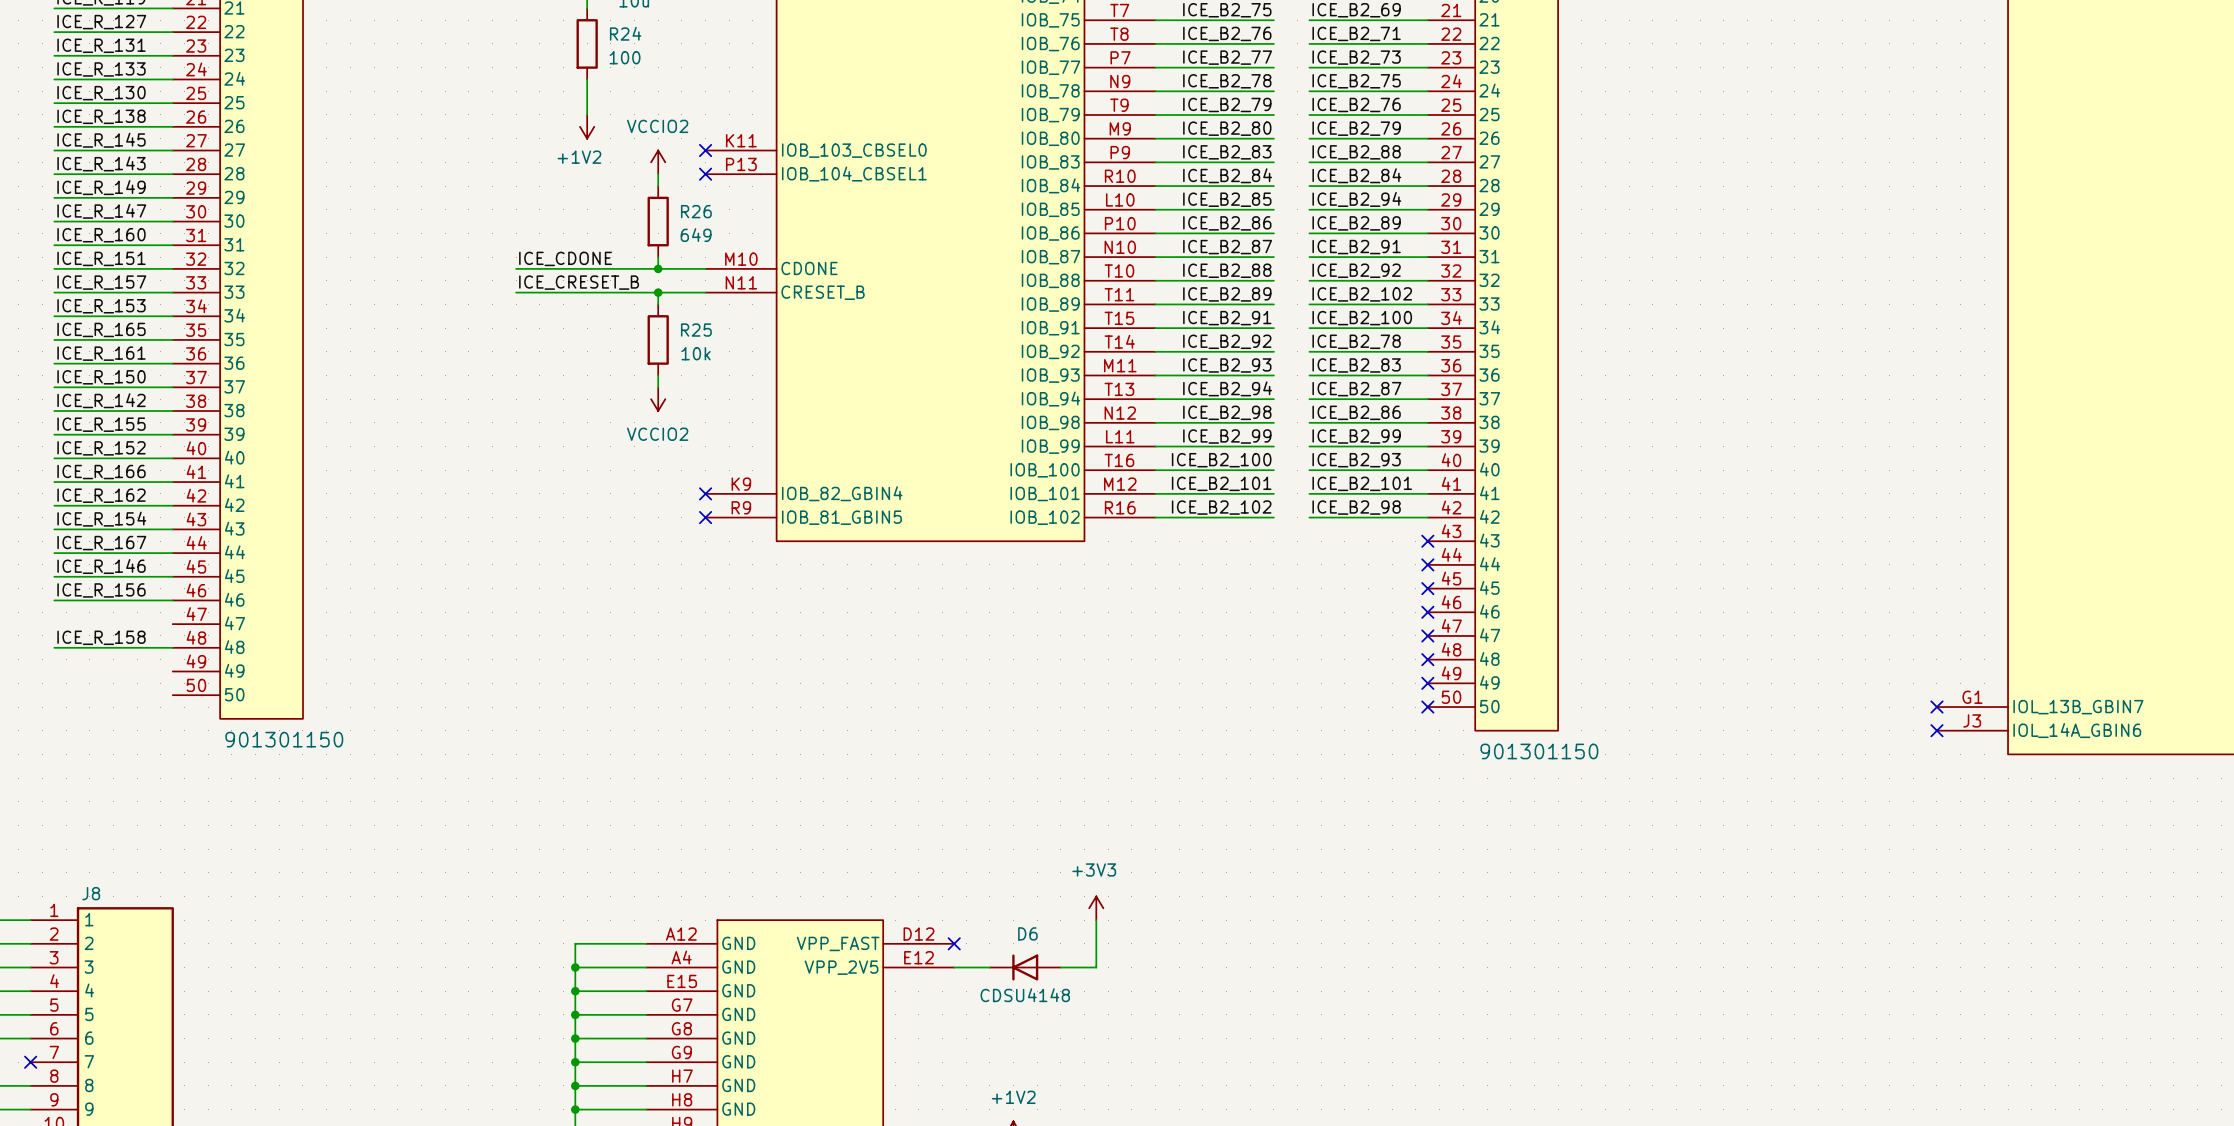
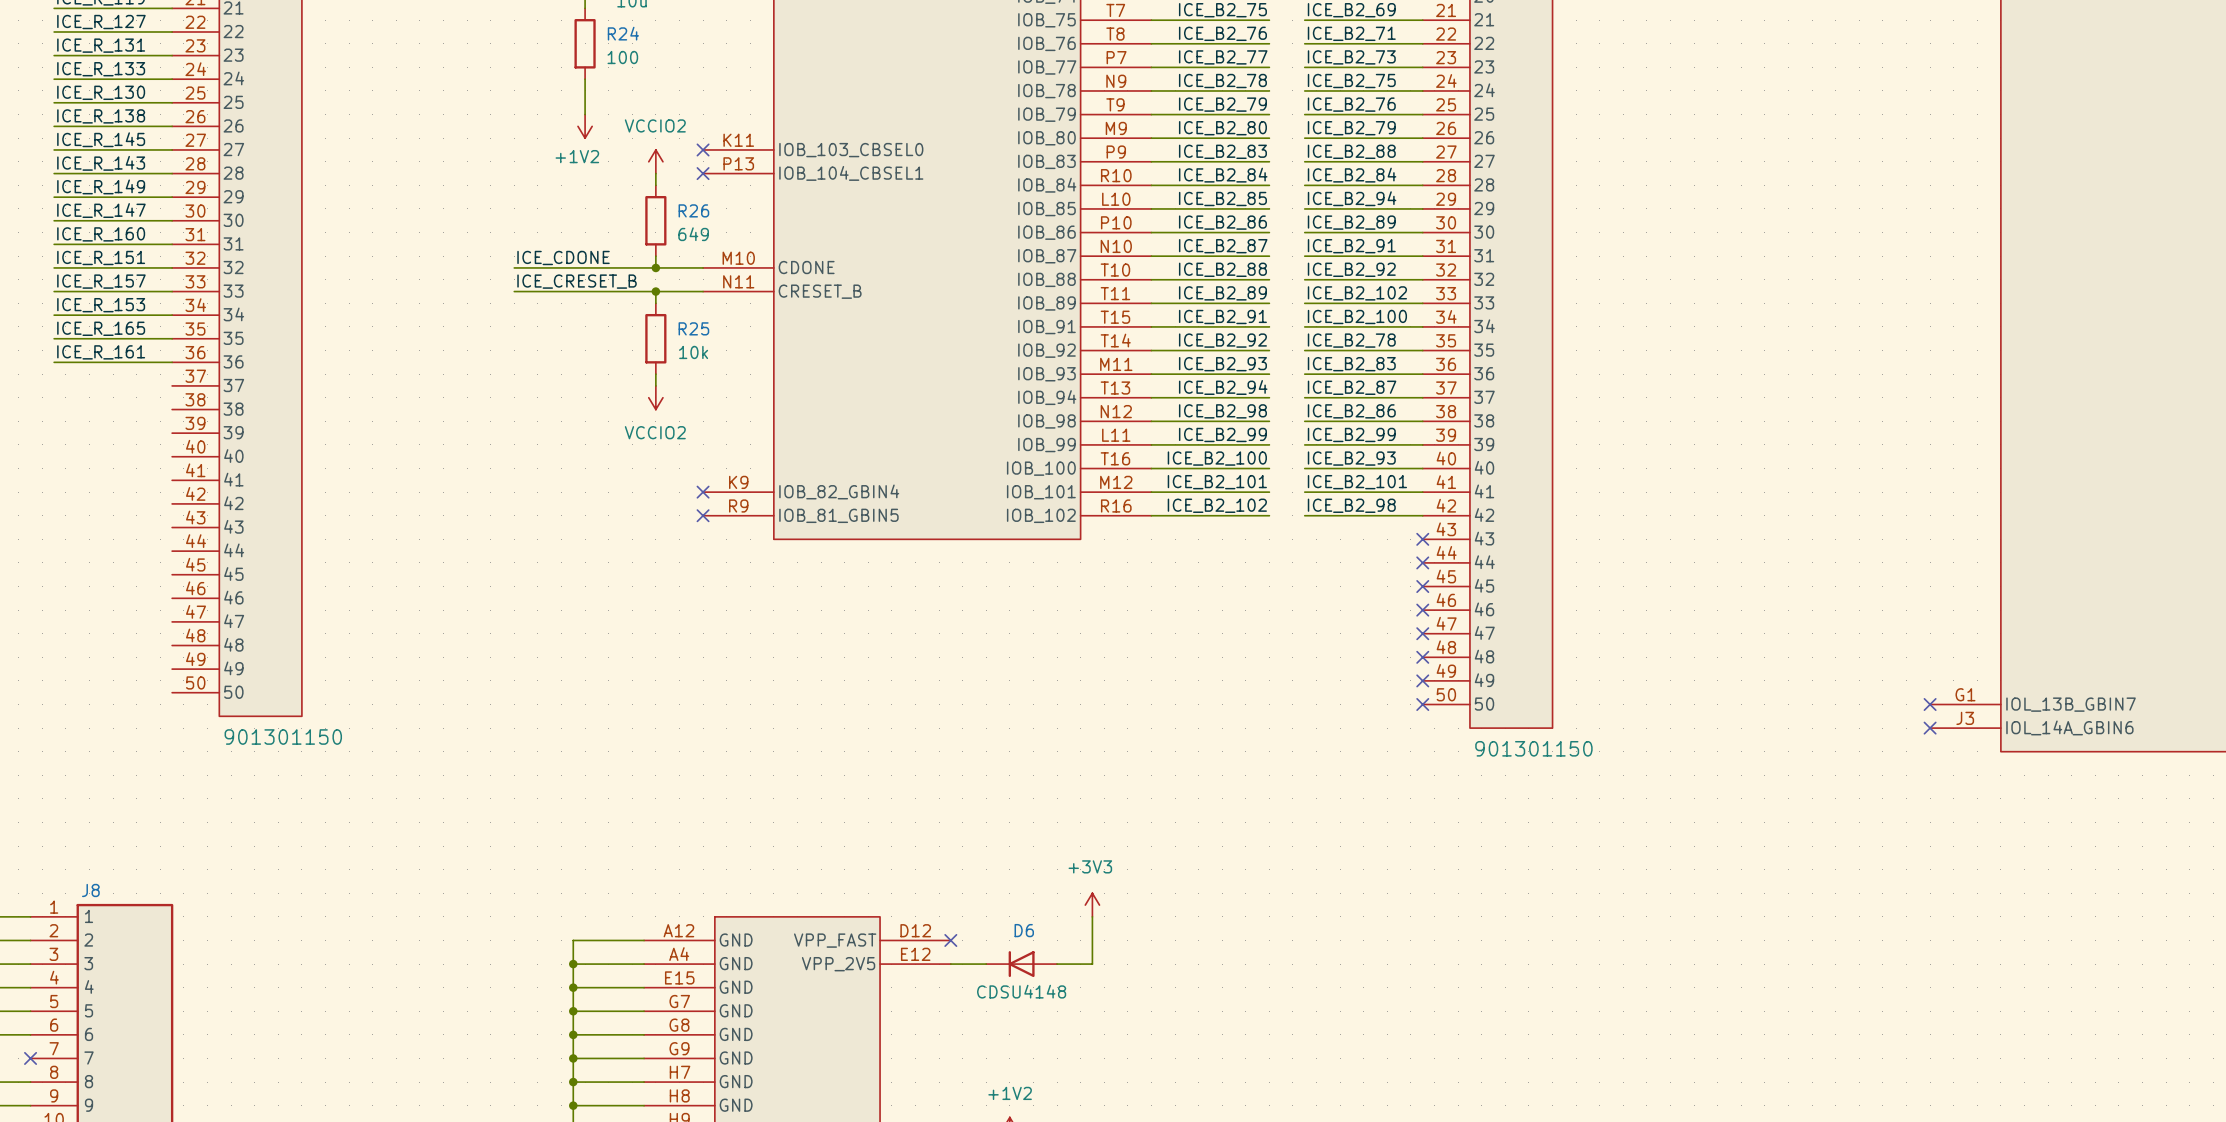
label: ICE_R_150 (101, 377) -> none
wire: (54, 387) (172, 387) -> none
label: ICE_R_142 (101, 400) -> none
wire: (54, 411) (172, 411) -> none
label: ICE_R_155 (101, 424) -> none
wire: (54, 434) (172, 434) -> none
label: ICE_R_152 (101, 448) -> none
wire: (54, 458) (172, 458) -> none
label: ICE_R_166 (101, 472) -> none
wire: (54, 482) (172, 482) -> none
label: ICE_R_162 (101, 495) -> none
wire: (54, 505) (172, 505) -> none
label: ICE_R_154 (101, 519) -> none
wire: (54, 529) (172, 529) -> none
label: ICE_R_167 (101, 543) -> none
wire: (54, 553) (172, 553) -> none
label: ICE_R_146 (101, 566) -> none
wire: (54, 576) (172, 576) -> none
label: ICE_R_156 (101, 590) -> none
wire: (54, 600) (172, 600) -> none
label: ICE_R_158 (101, 637) -> none
wire: (54, 647) (172, 647) -> none

